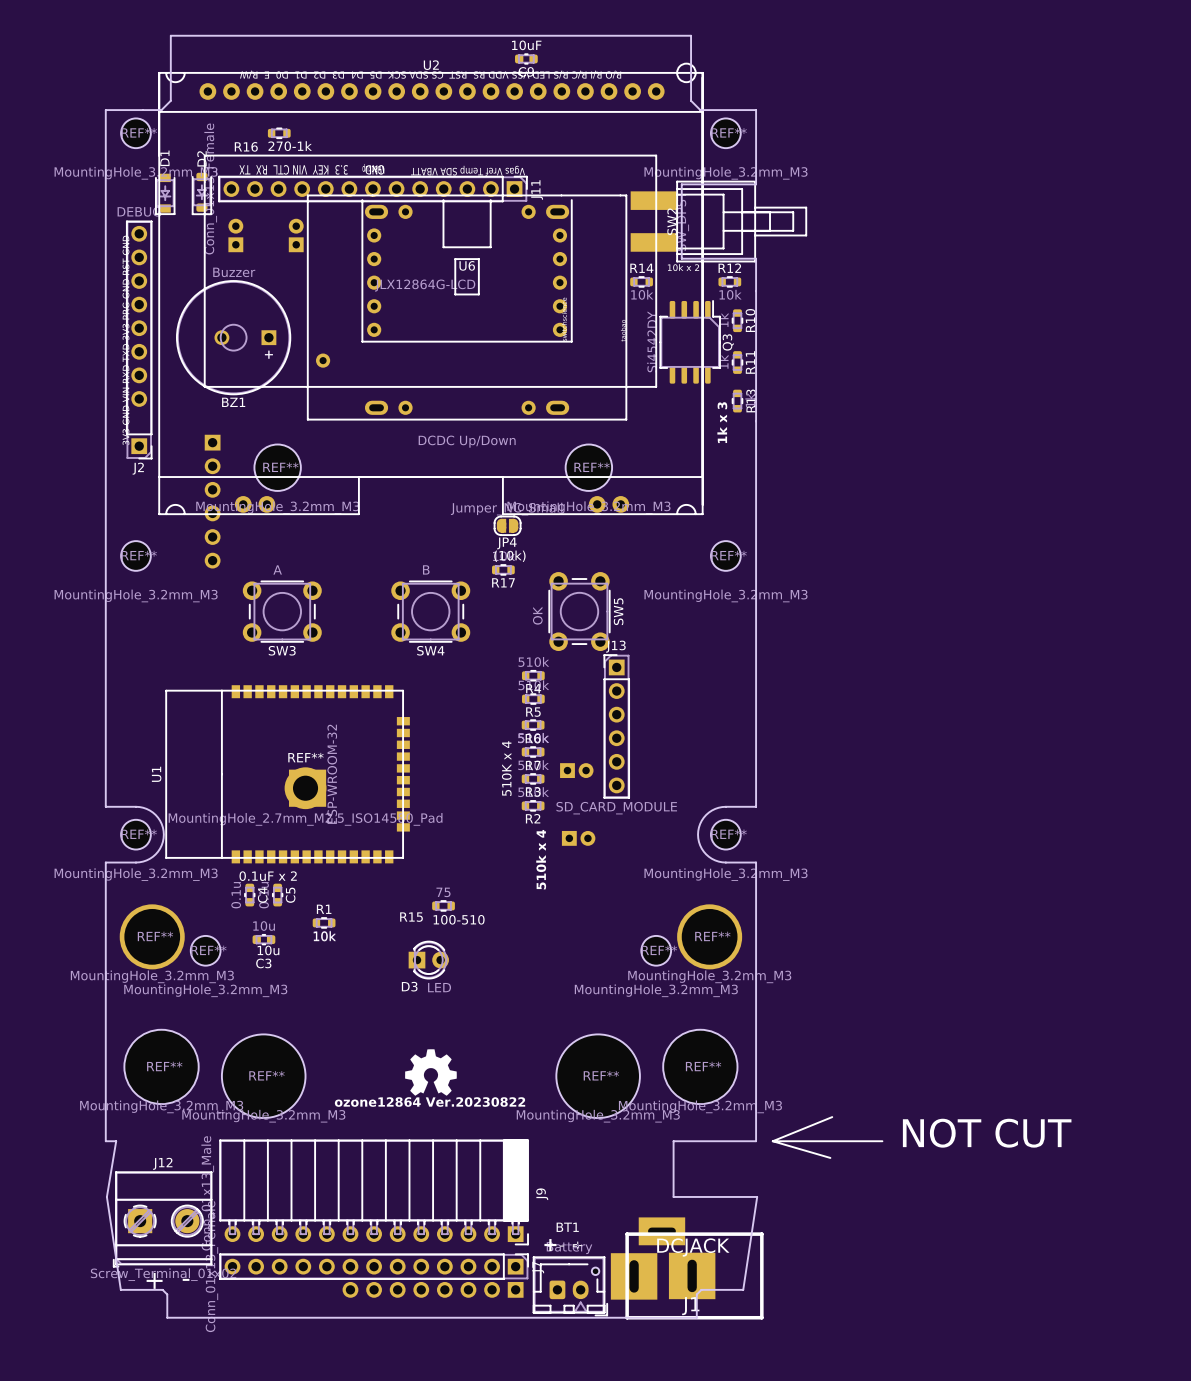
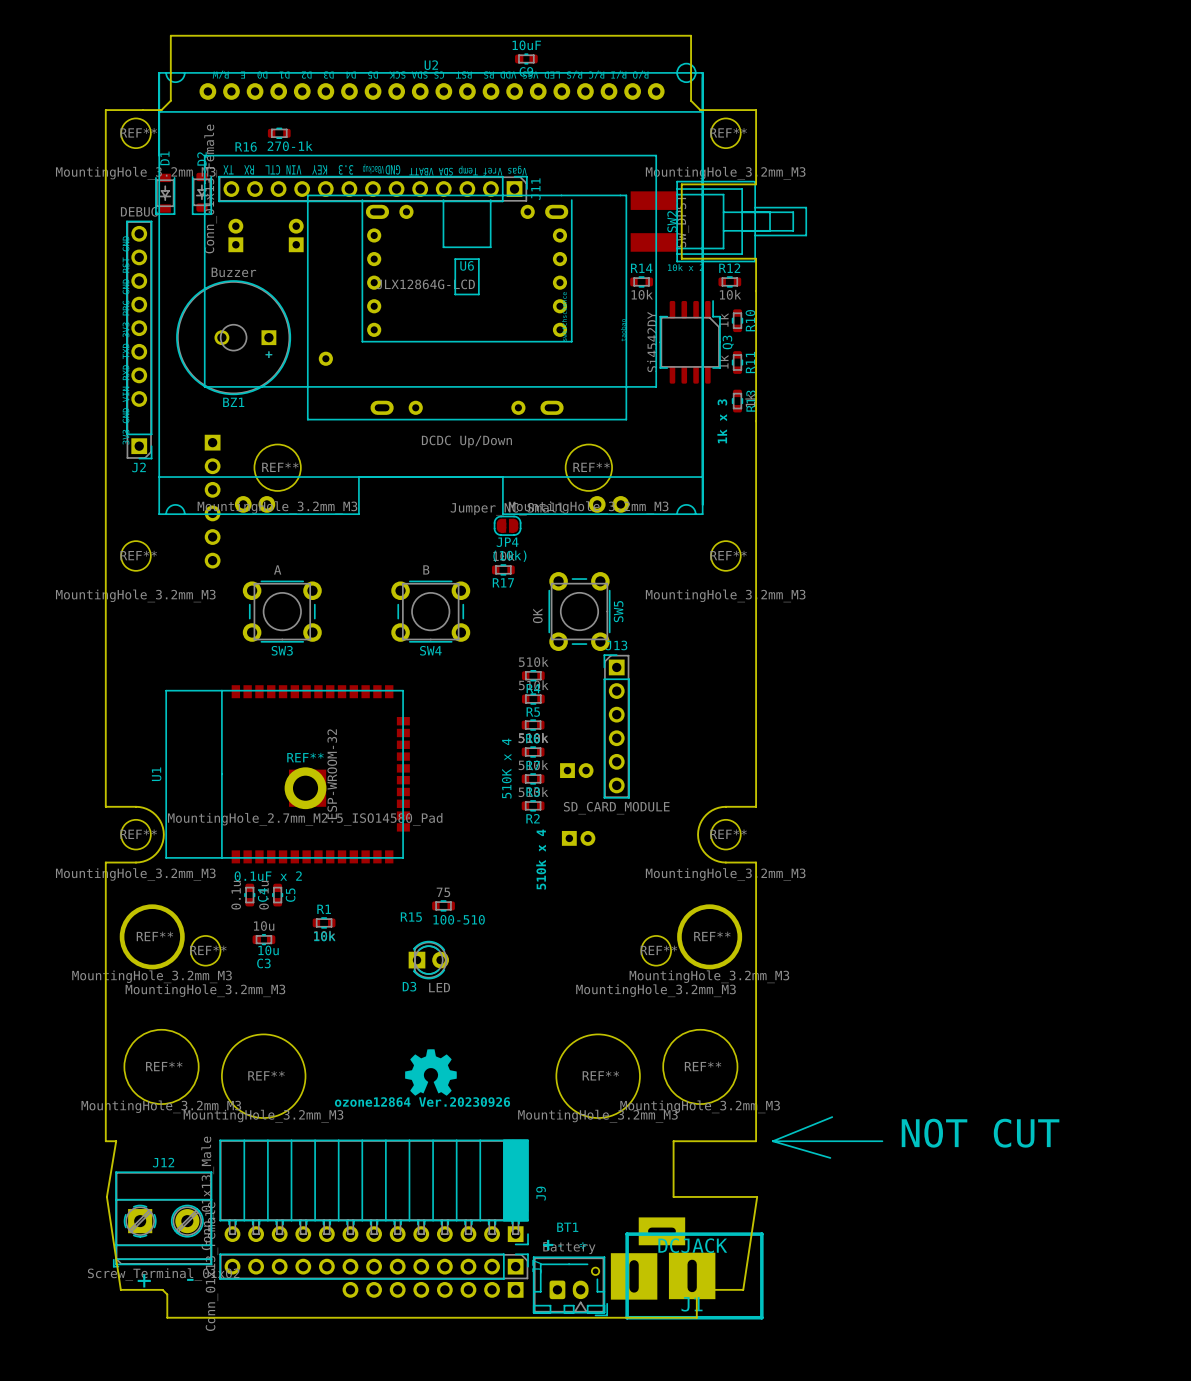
U6 footprint: [307, 194, 627, 421] -> [307, 194, 627, 421]
text: ozone12864 Ver.20230822 (430, 1102) -> ozone12864 Ver.20230926 (422, 1102)

